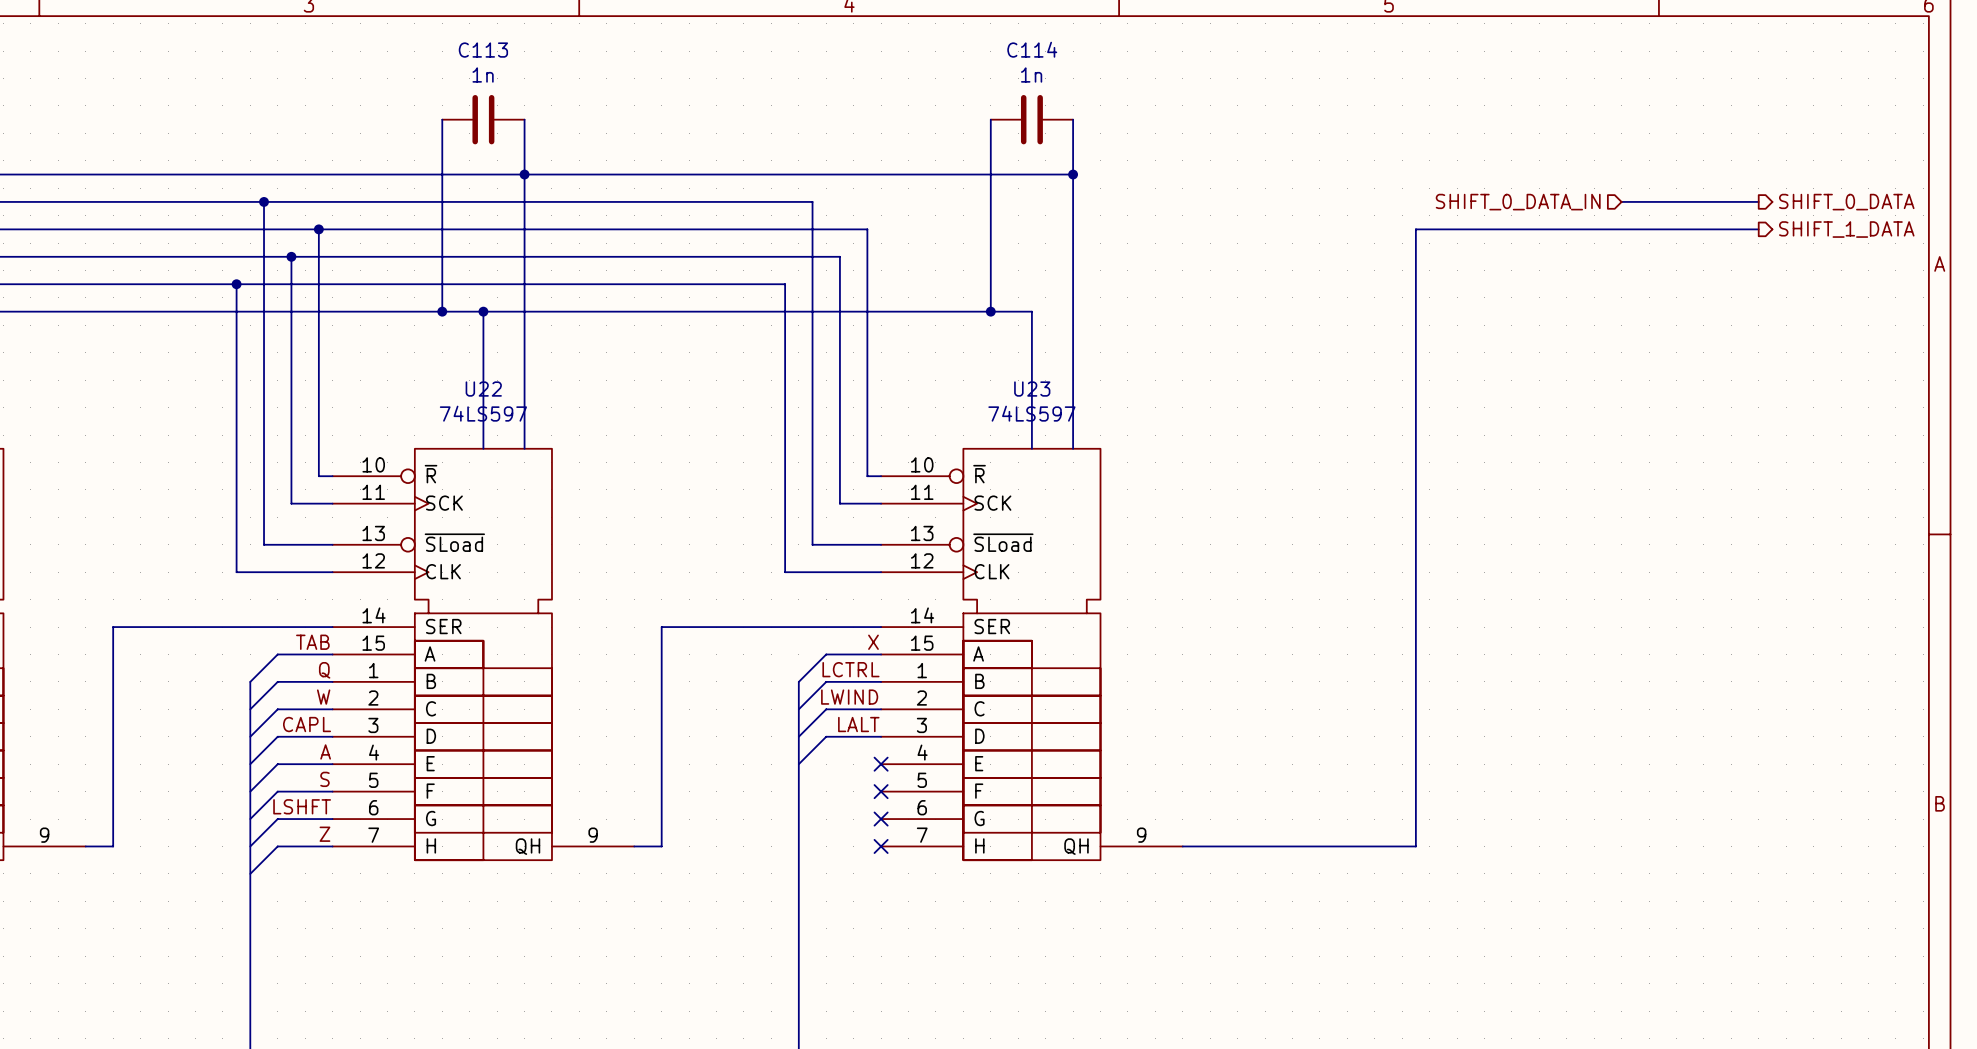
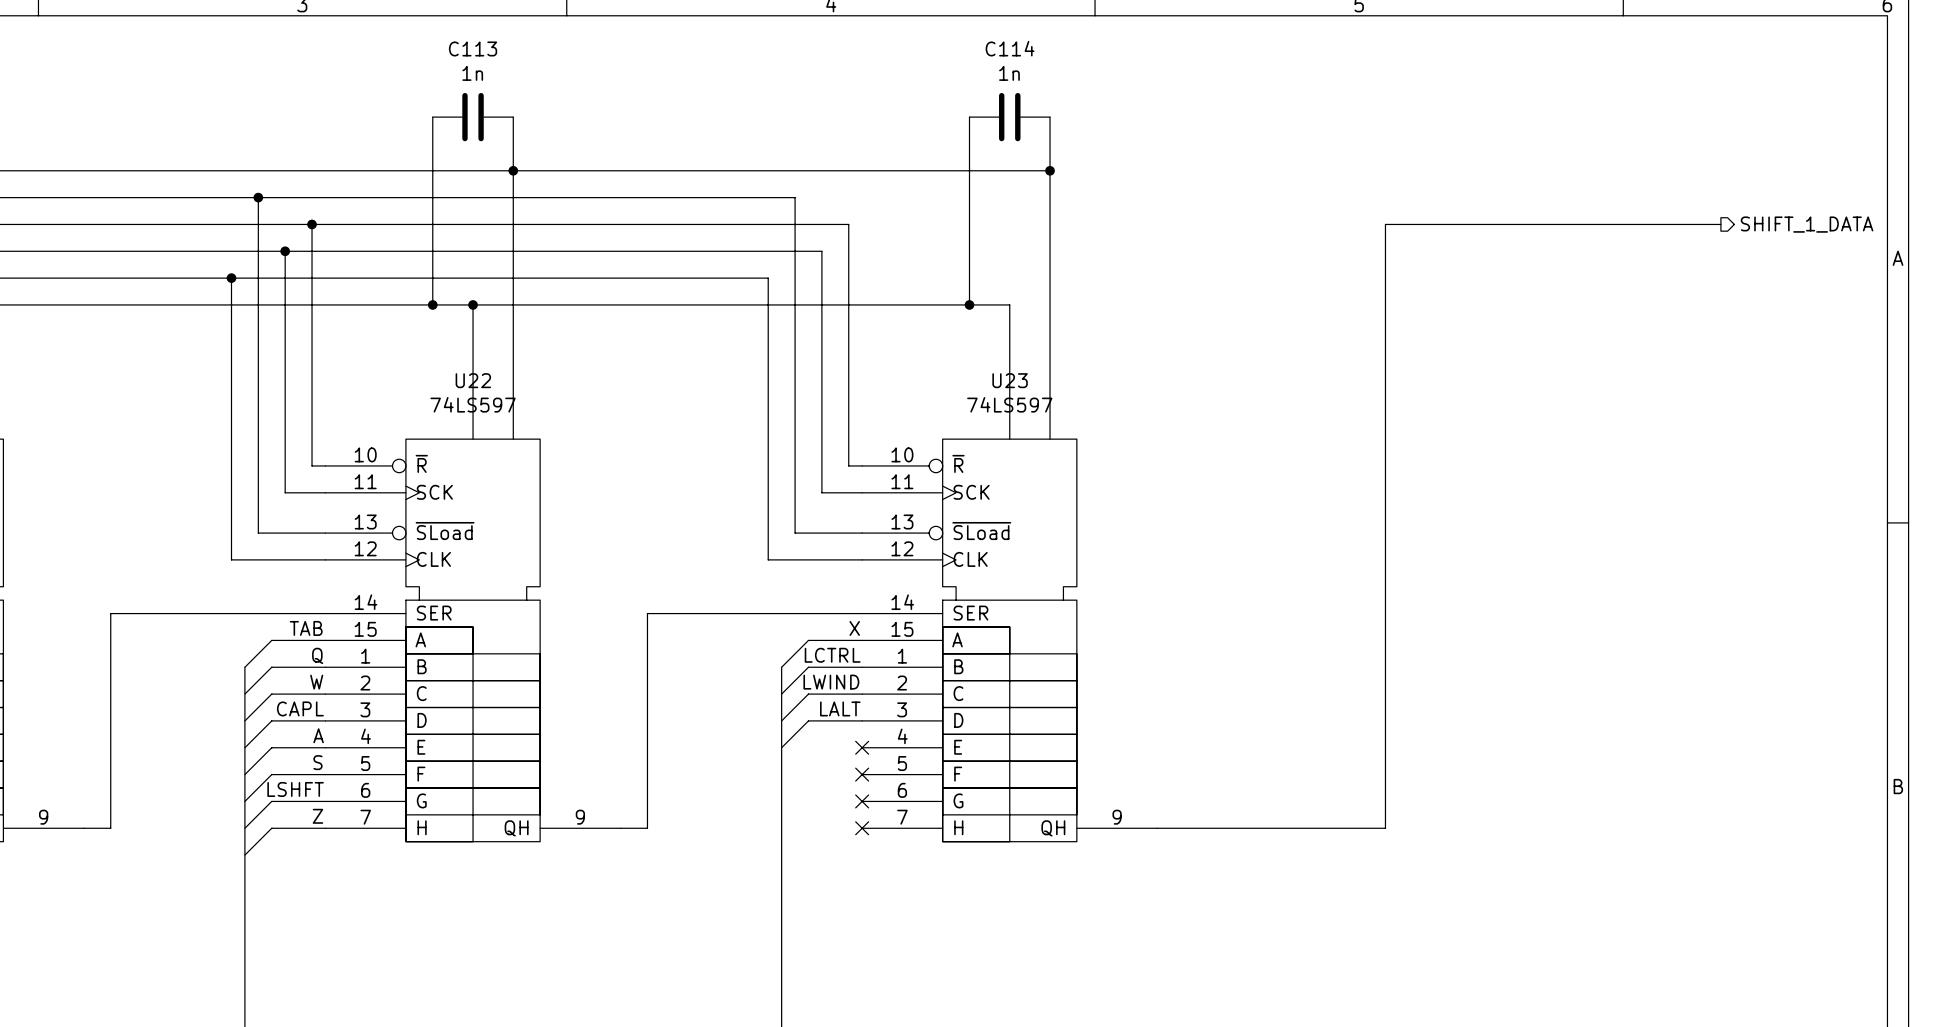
wire: (1621, 201) (1758, 201) -> none
hierarchical label: SHIFT_0_DATA_IN (1518, 202) -> none
hierarchical label: SHIFT_0_DATA (1846, 202) -> none

